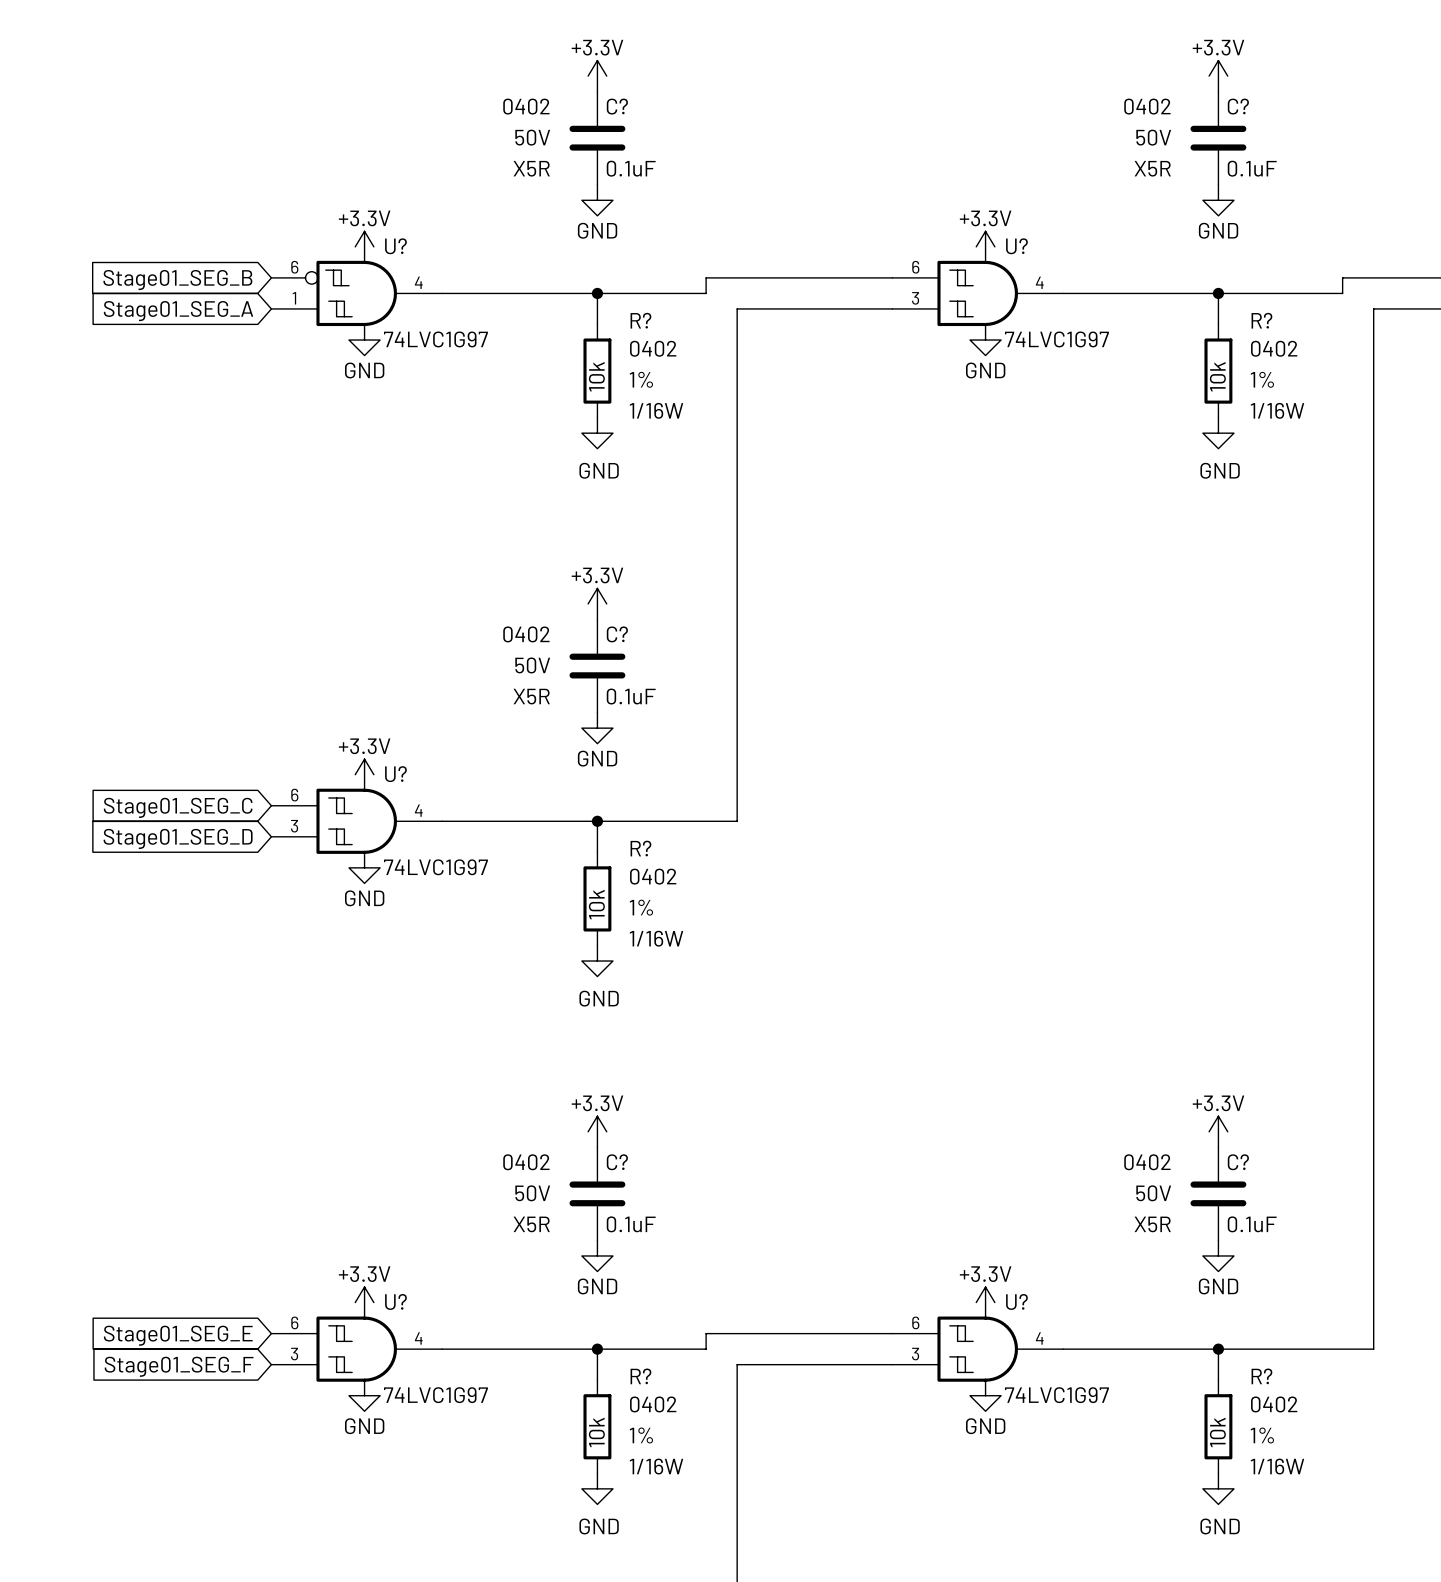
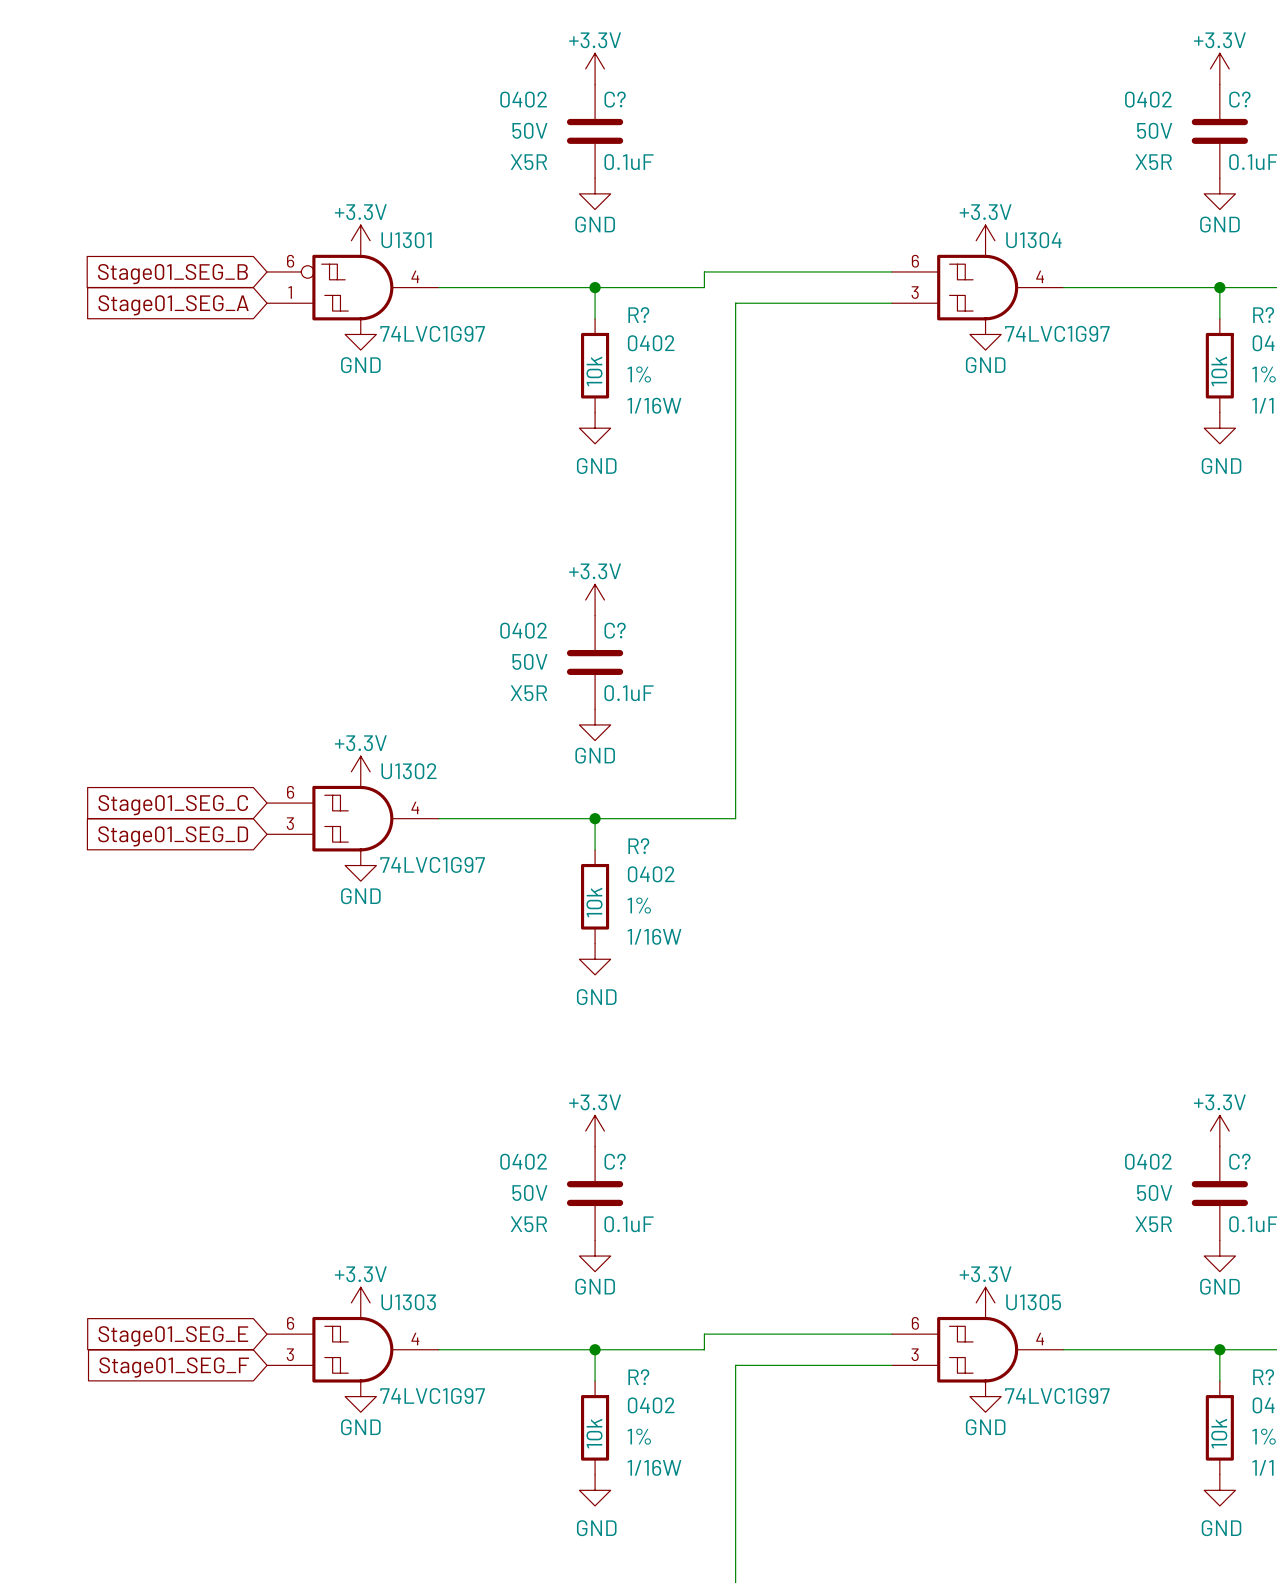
U? name: U? (395, 246) -> U1301 (406, 240)
U? name: U? (1016, 246) -> U1304 (1033, 240)
U? name: U? (395, 774) -> U1302 (408, 771)
U? name: U? (395, 1301) -> U1303 (408, 1302)
U? name: U? (1016, 1301) -> U1305 (1033, 1302)

